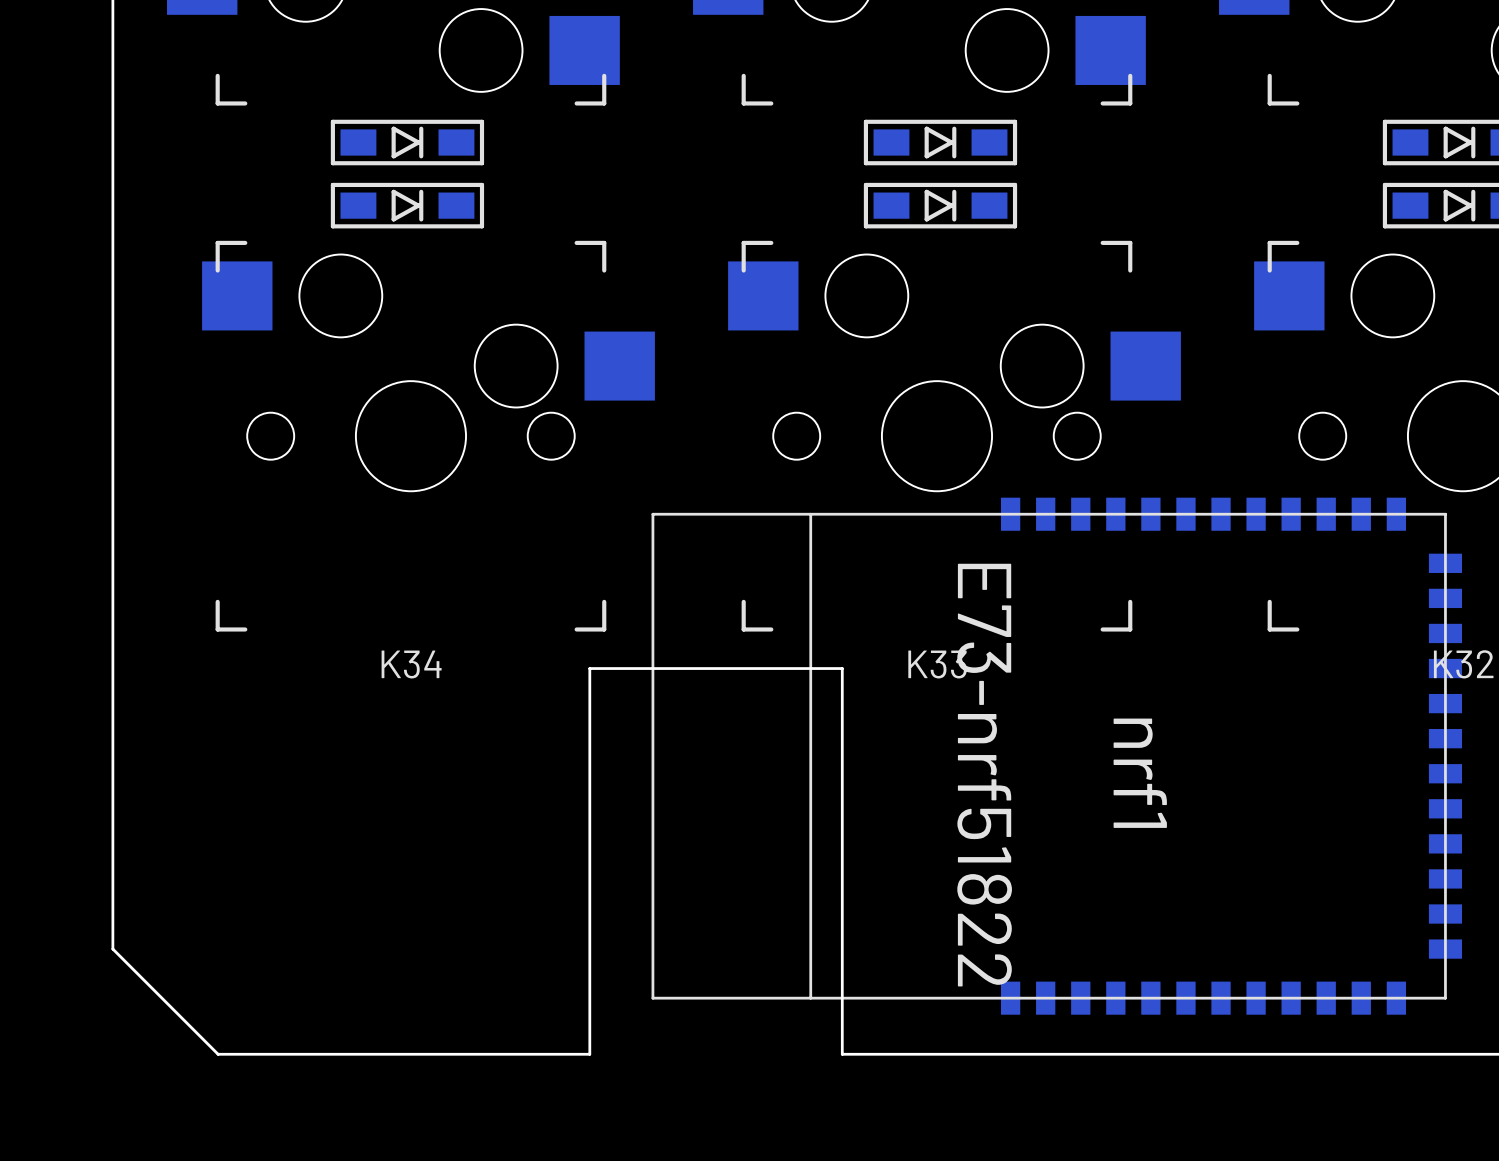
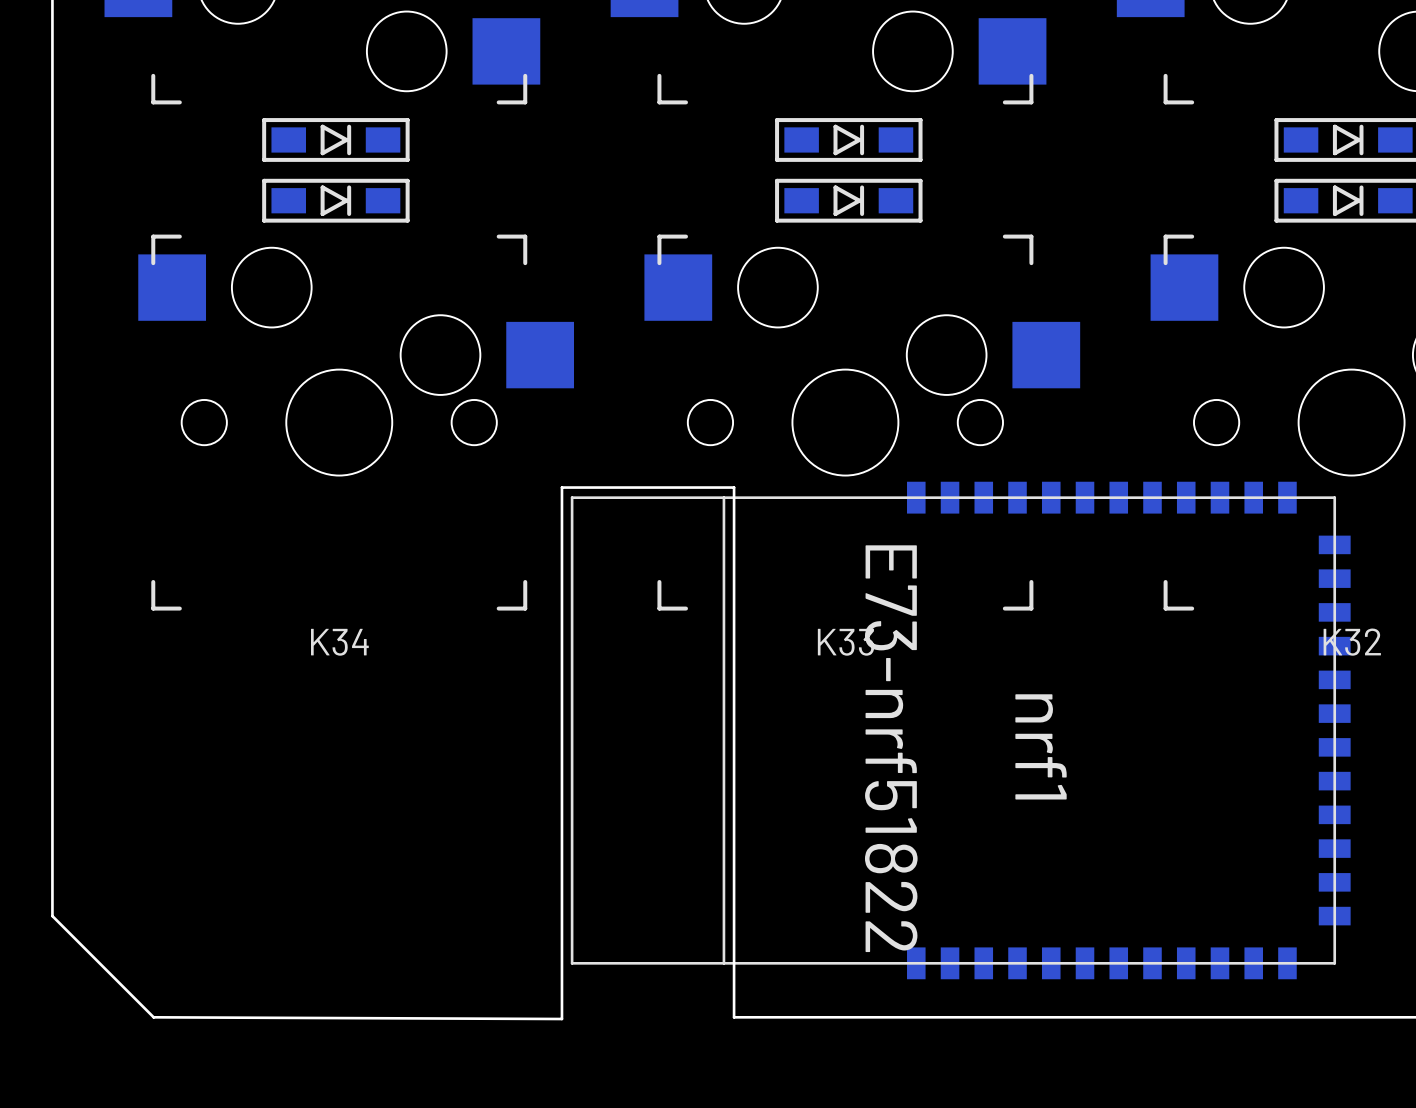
board edge: (842, 1054) (842, 668) (589, 668) (589, 1054) (218, 1054) -> (754, 1017) (734, 1017) (734, 487) (561, 487) (561, 1019) (153, 1017)

